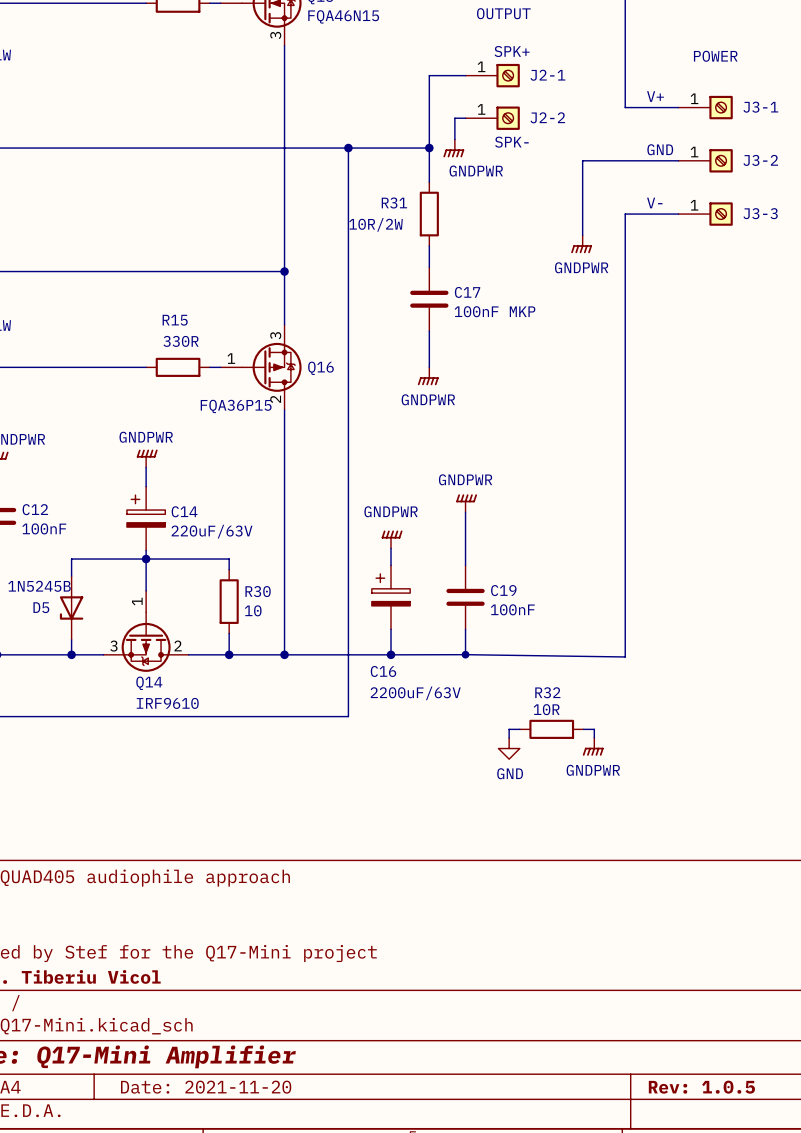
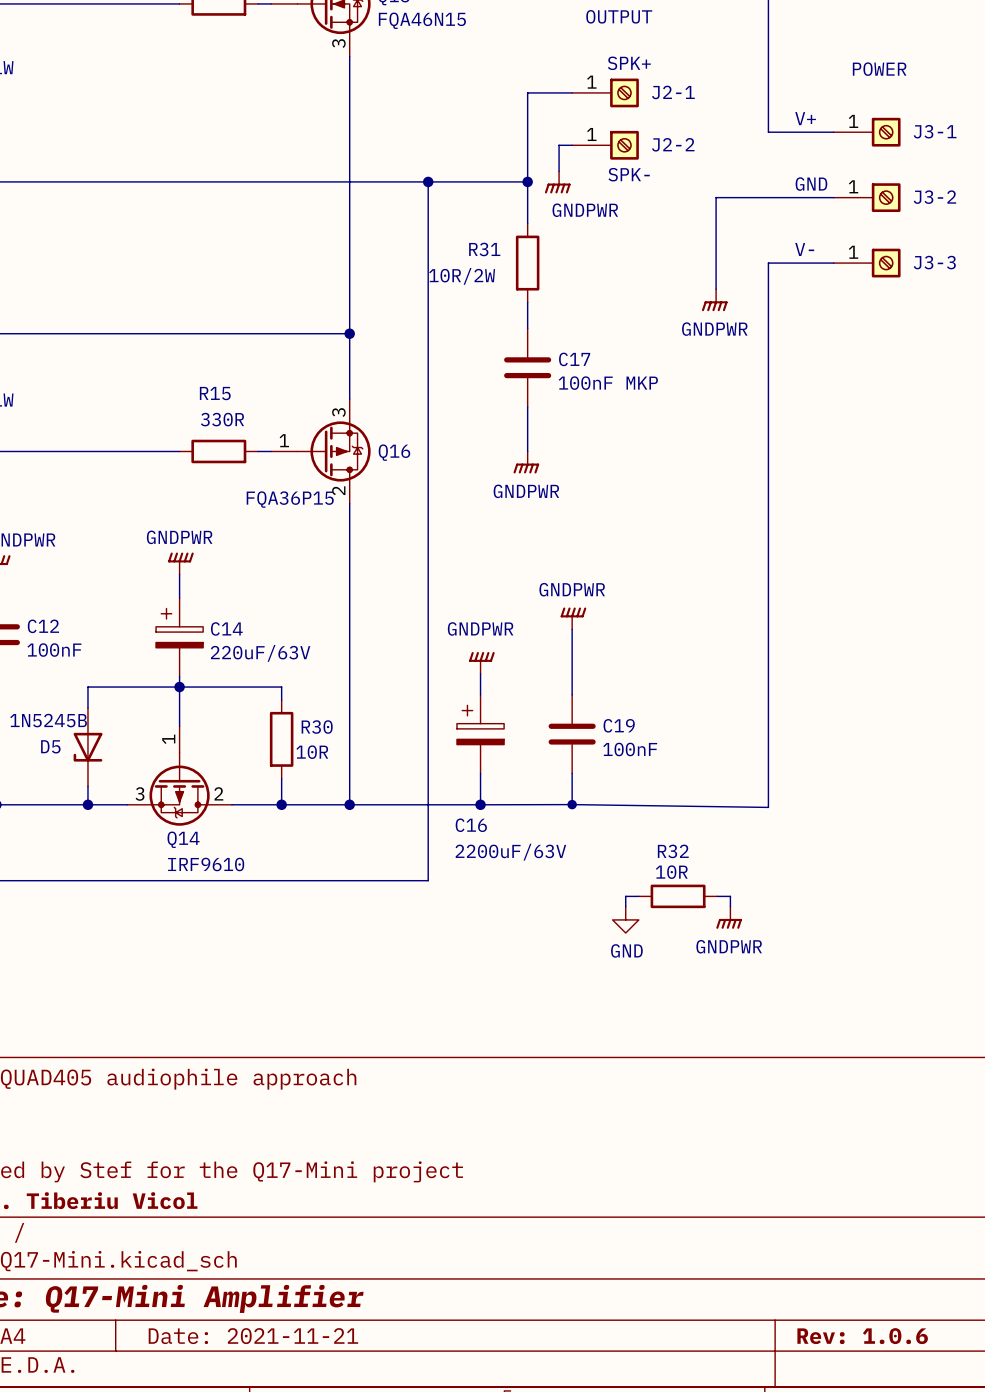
R30 value: 10 (253, 610) -> 10R (312, 752)
title block: Date: 2021-11-20 (206, 1087) -> Date: 2021-11-21 (253, 1336)
title block: Rev: 1.0.5 (701, 1087) -> Rev: 1.0.6 (862, 1336)

